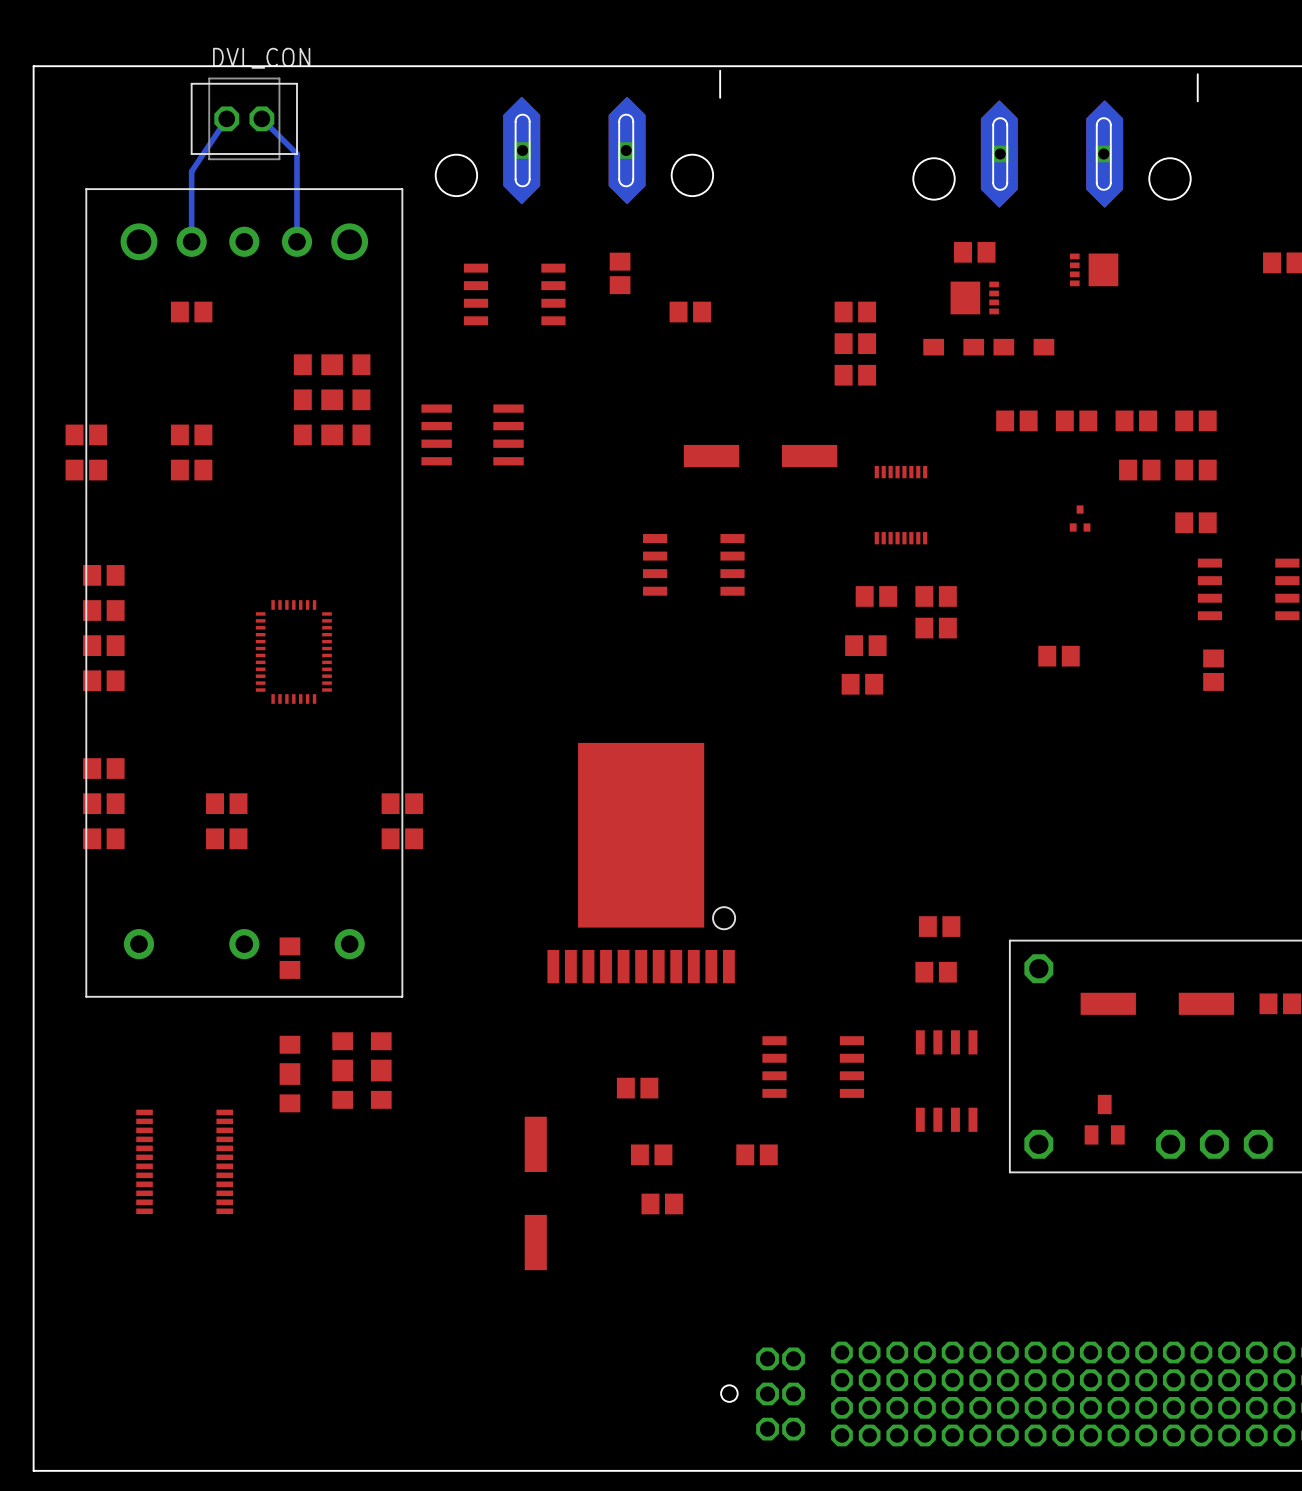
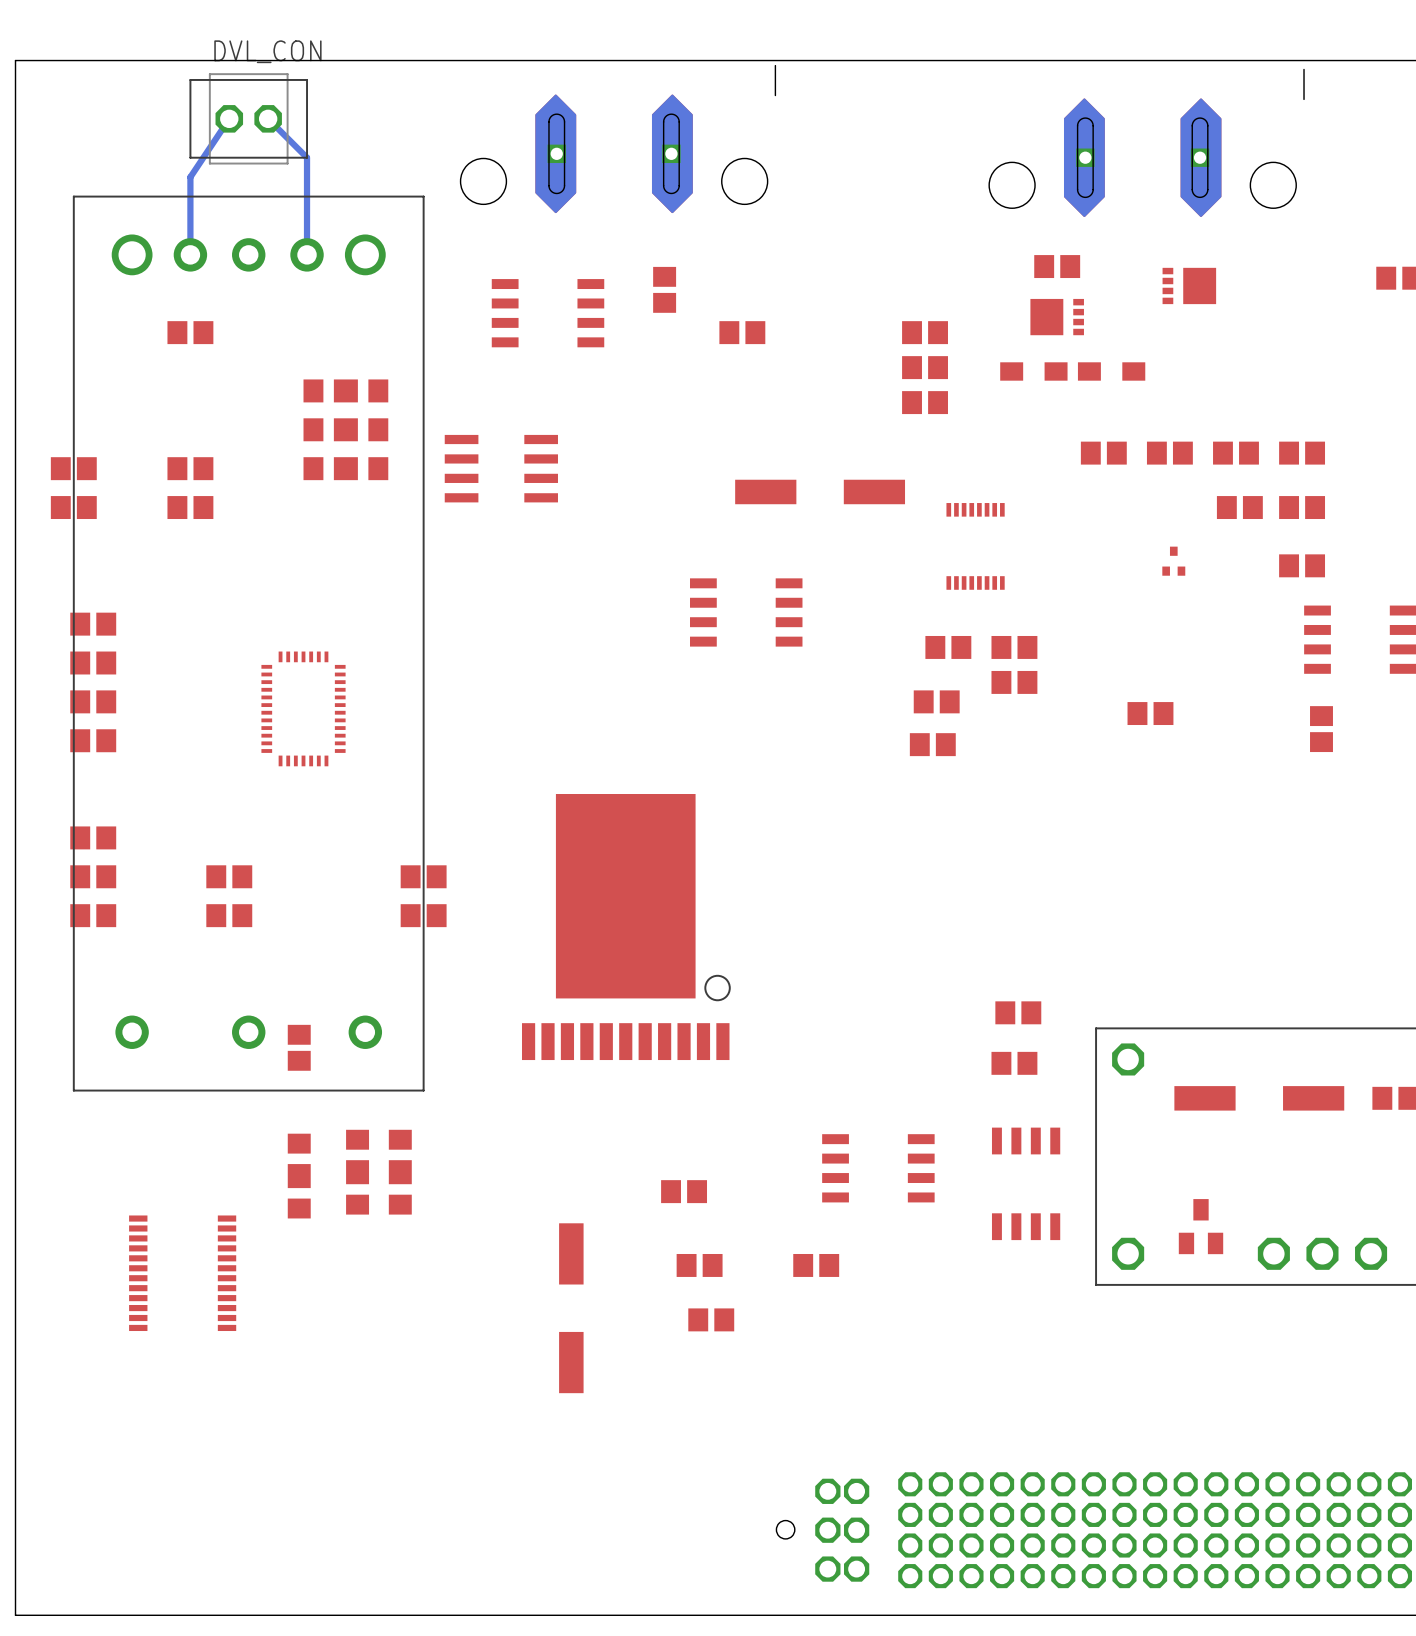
part position: (641, 863) -> (626, 927)

